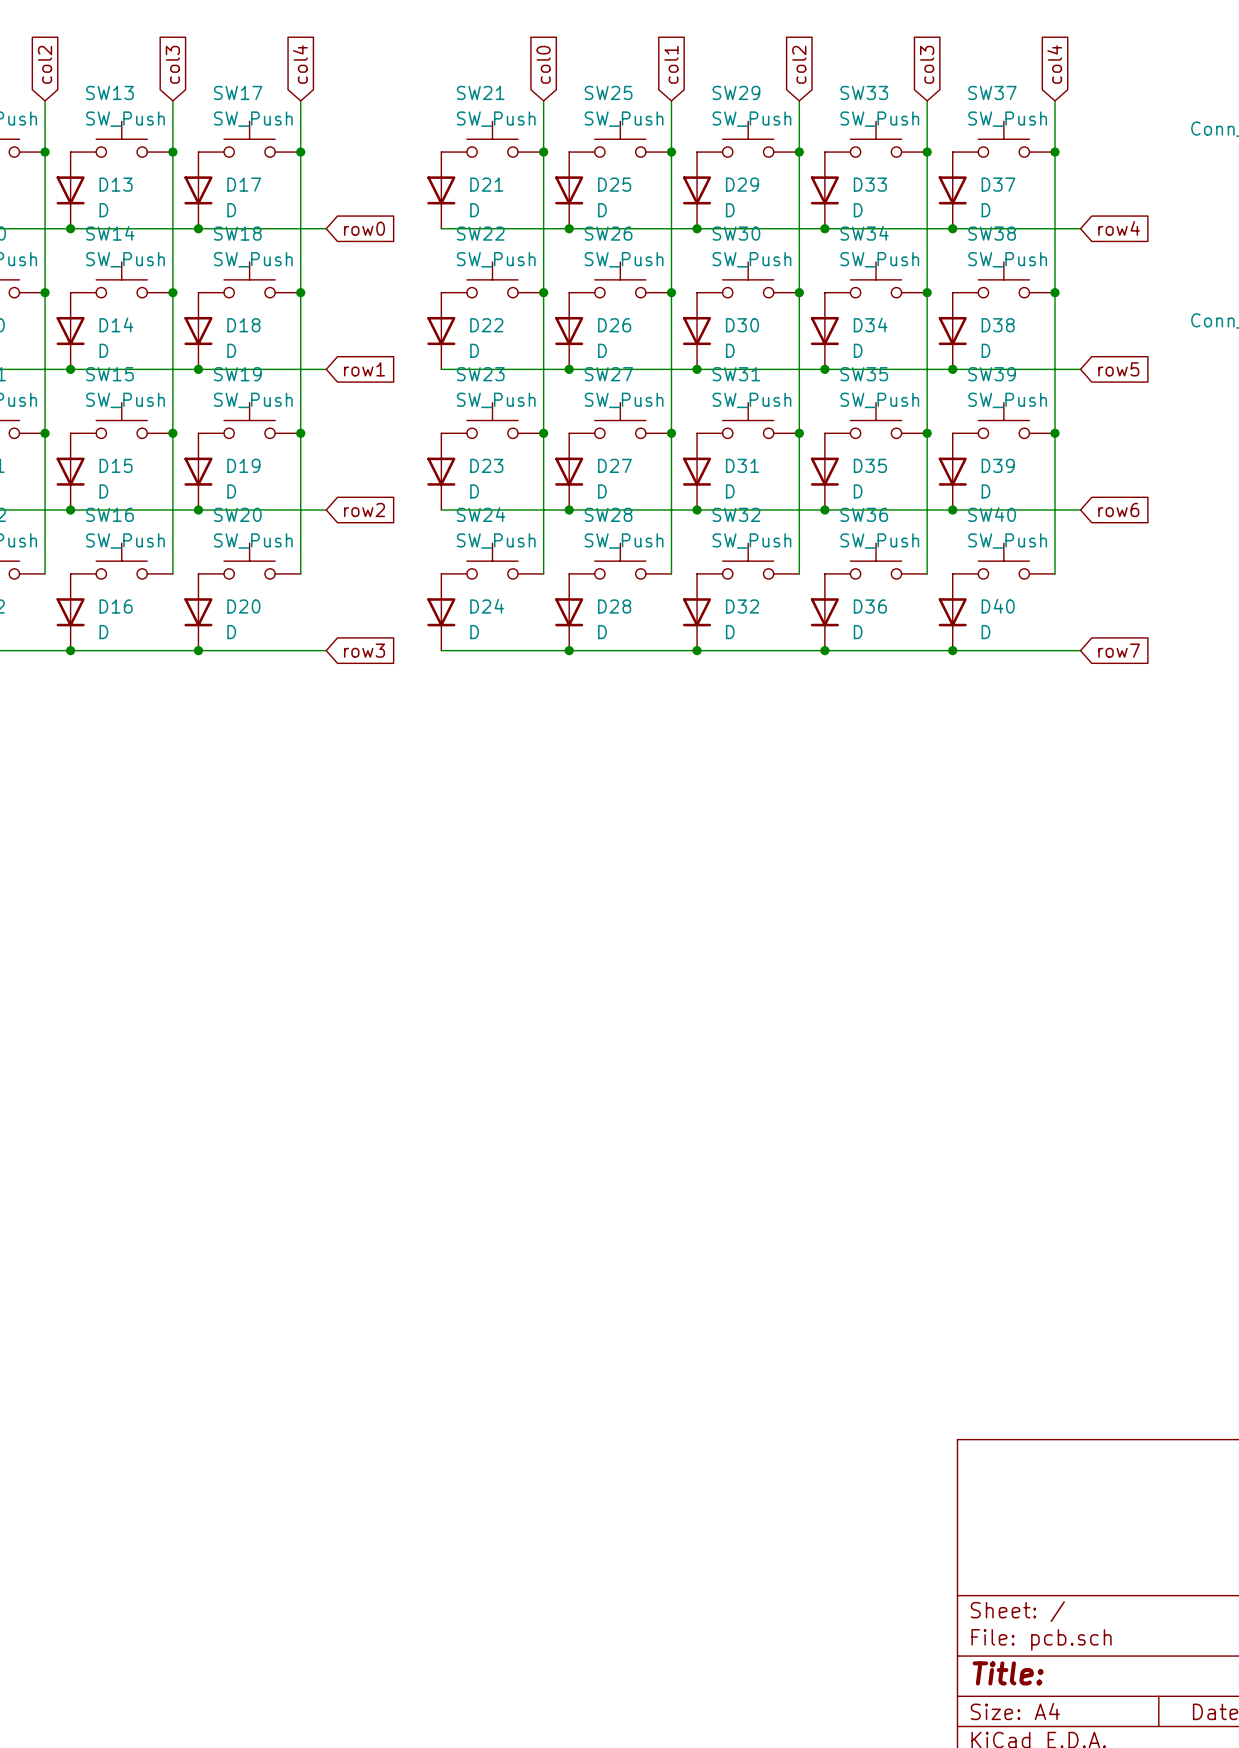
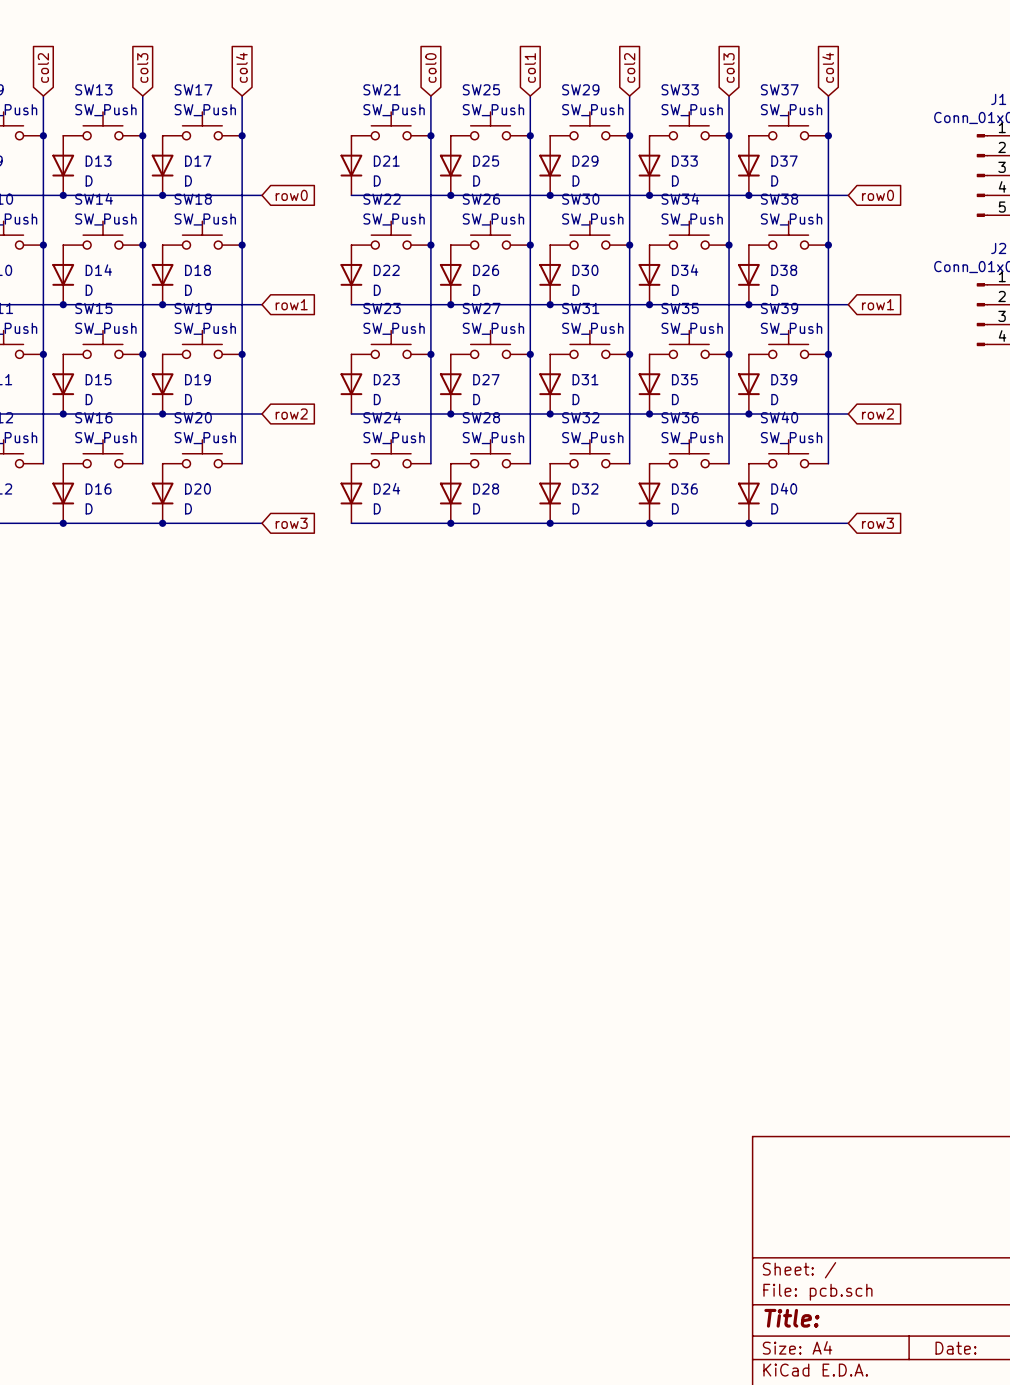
global label: row4 (1119, 228) -> row0 (877, 195)
global label: row5 (1118, 369) -> row1 (877, 304)
global label: row6 (1118, 510) -> row2 (877, 414)
global label: row7 (1119, 650) -> row3 (877, 523)

